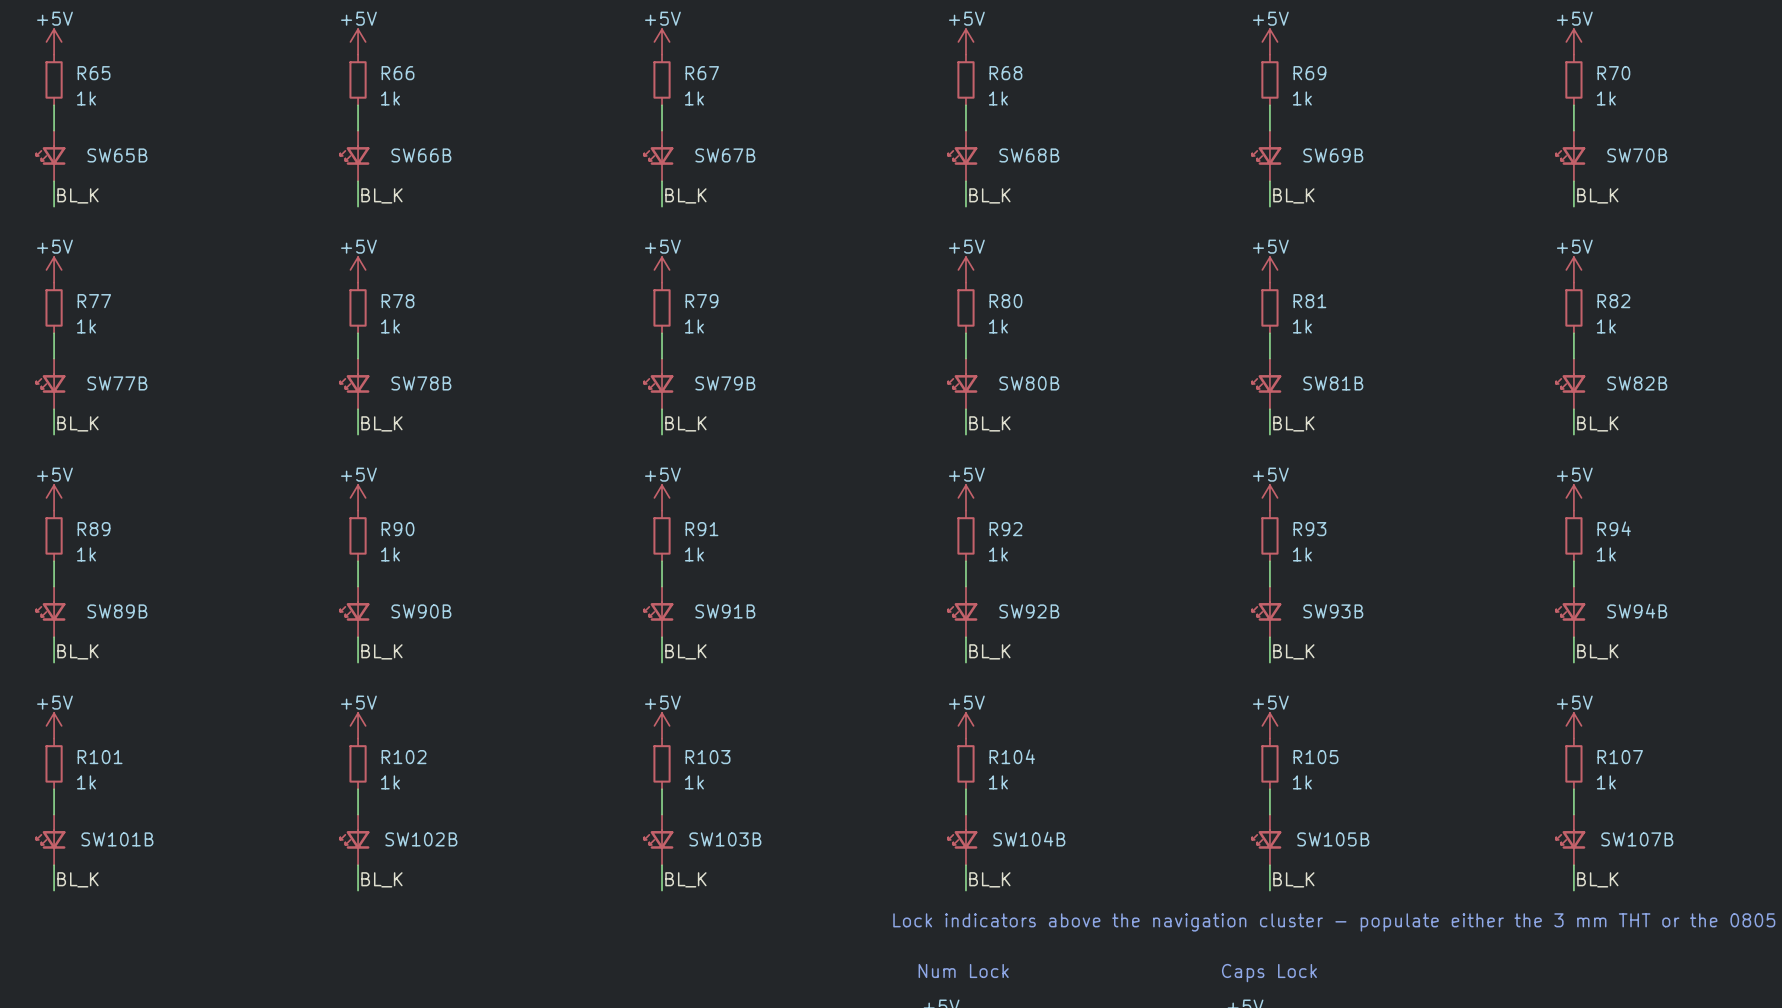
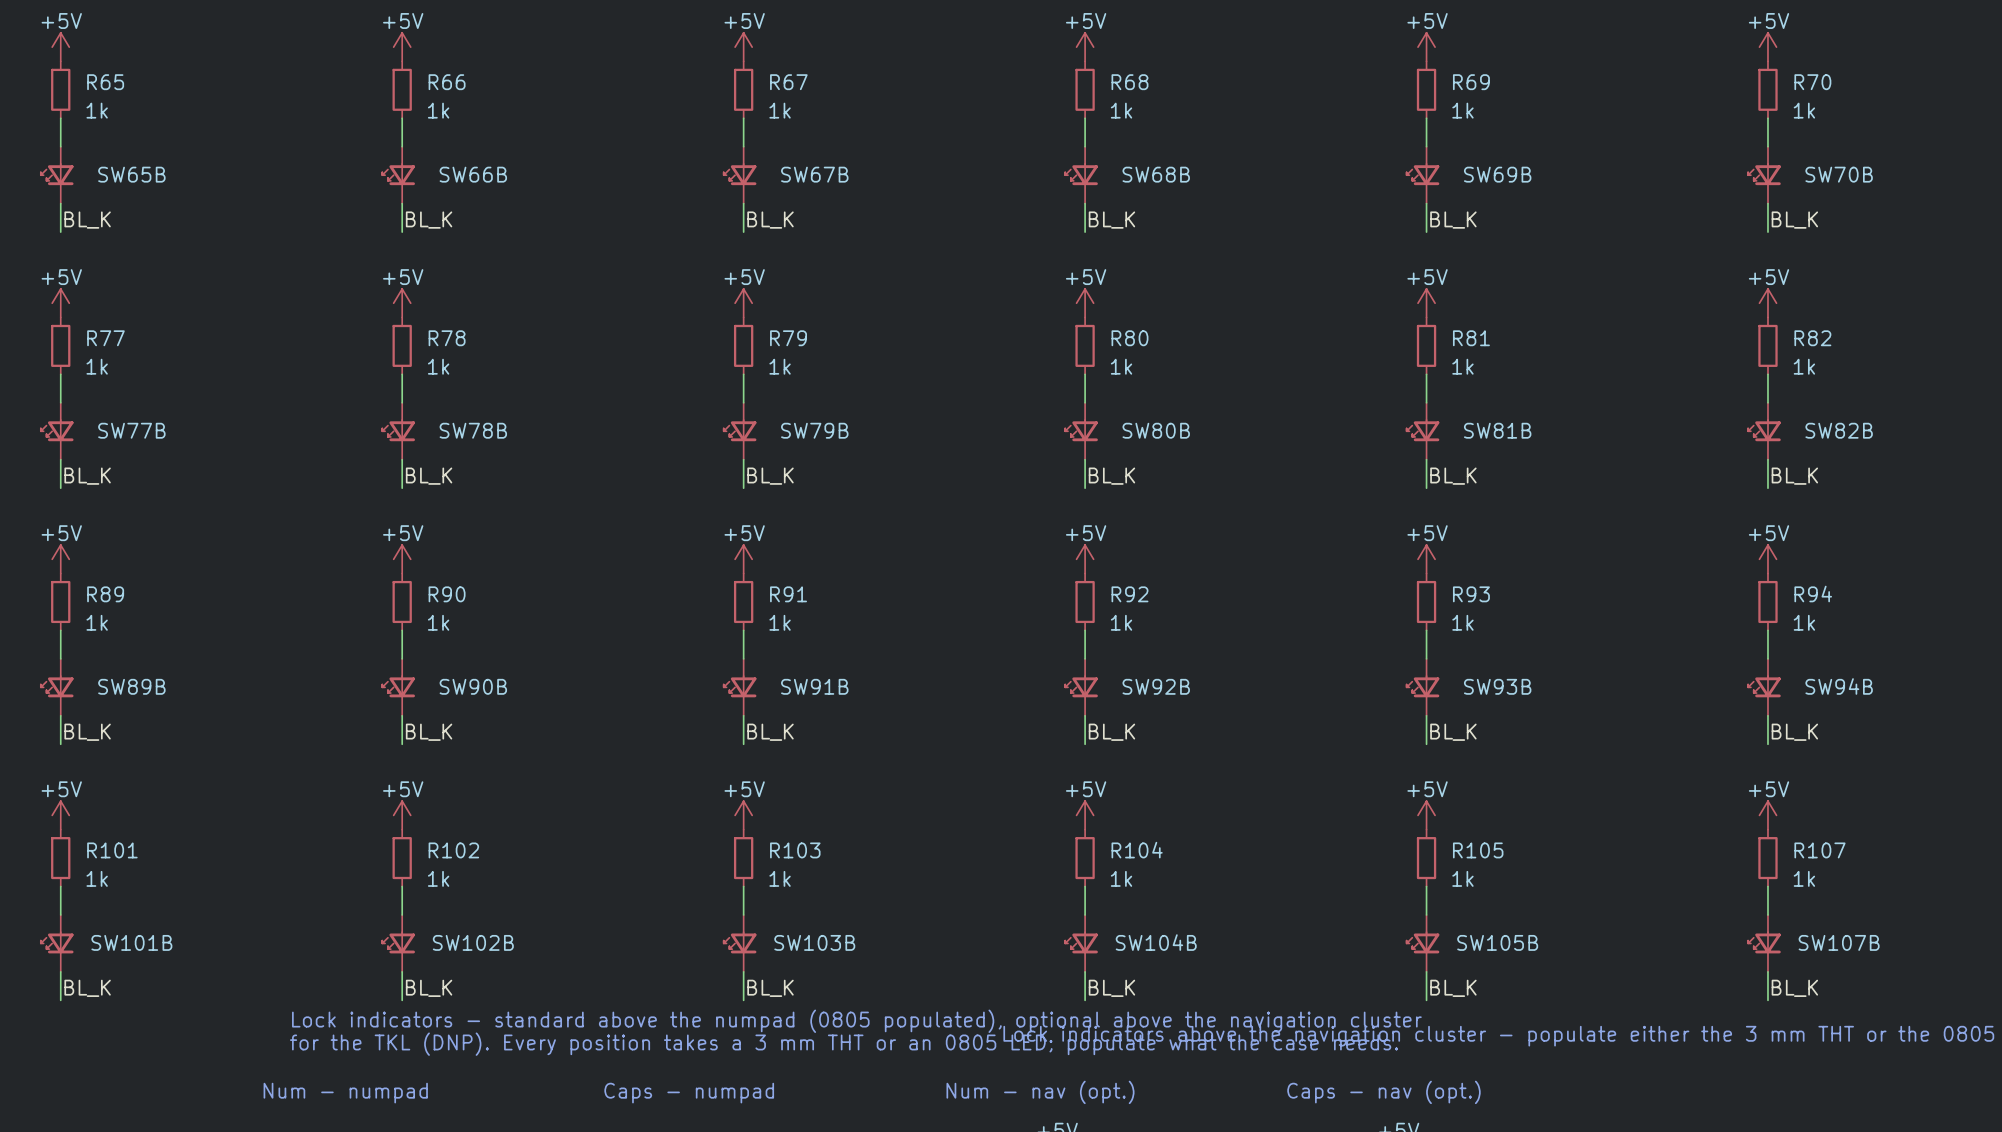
text: none -> Lock indicators - standard above the numpad (0805 populated), optional above the navigation cluster (856, 1021)
text: none -> for the TKL (DNP). Every position takes a 3 mm THT or an 0805 LED; populate what the case needs. (844, 1044)
text: Num Lock (963, 970) -> none
text: none -> Num - nav (opt.) (1040, 1092)
text: none -> Caps - nav (opt.) (1383, 1092)
text: none -> Num - numpad (345, 1093)
text: none -> Caps - numpad (689, 1093)
text: Caps Lock (1269, 973) -> none

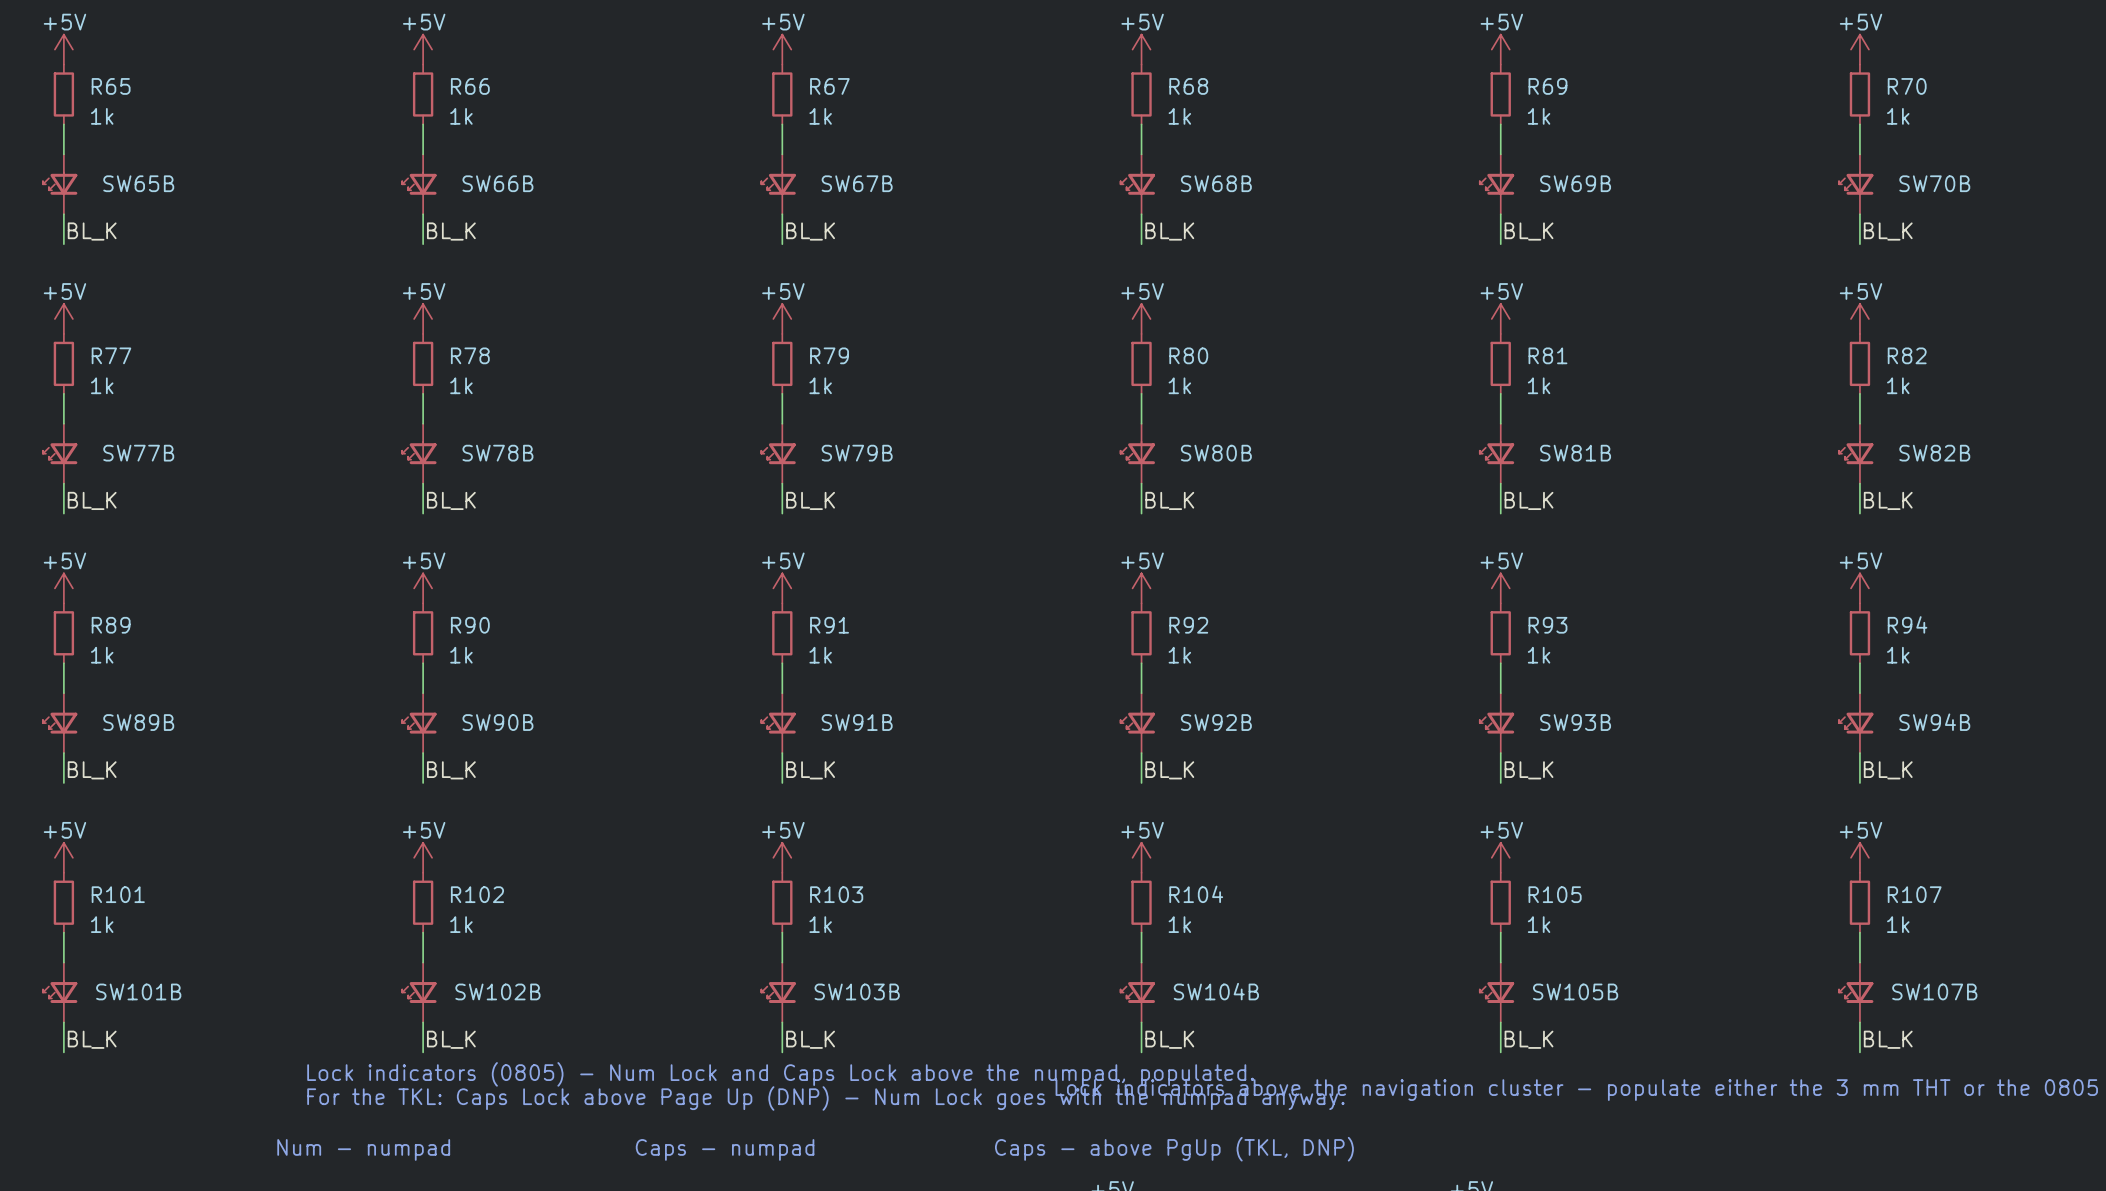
text: Lock indicators - standard above the numpad (0805 populated), optional above the navigation cluster (856, 1021) -> Lock indicators (0805) - Num Lock and Caps Lock above the numpad, populated. (780, 1074)
text: for the TKL (DNP). Every position takes a 3 mm THT or an 0805 LED; populate what the case needs. (844, 1044) -> For the TKL: Caps Lock above Page Up (DNP) - Num Lock goes with the numpad anyway. (825, 1098)
text: Num - nav (opt.) (1040, 1092) -> Caps - above PgUp (TKL, DNP) (1174, 1149)
text: Caps - nav (opt.) (1383, 1092) -> none

